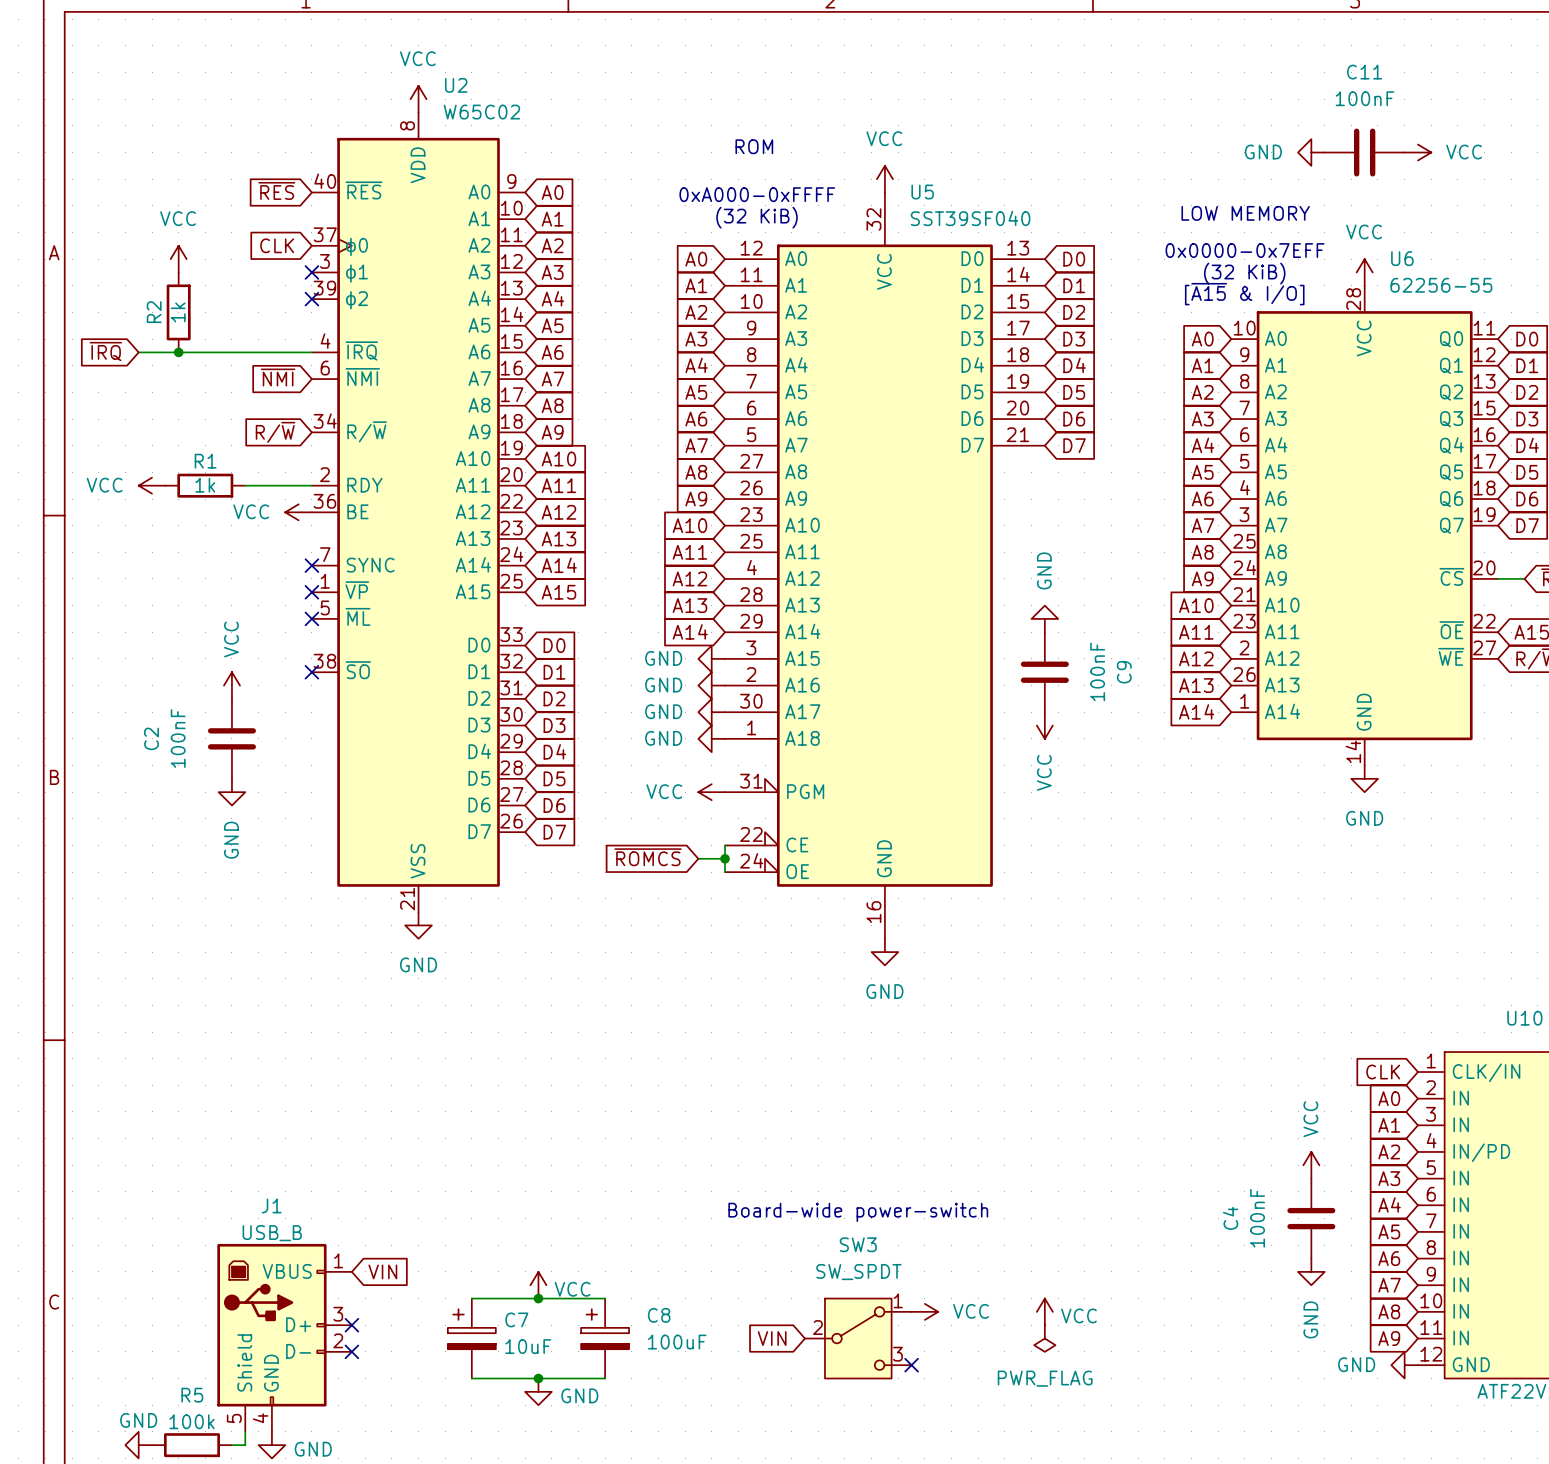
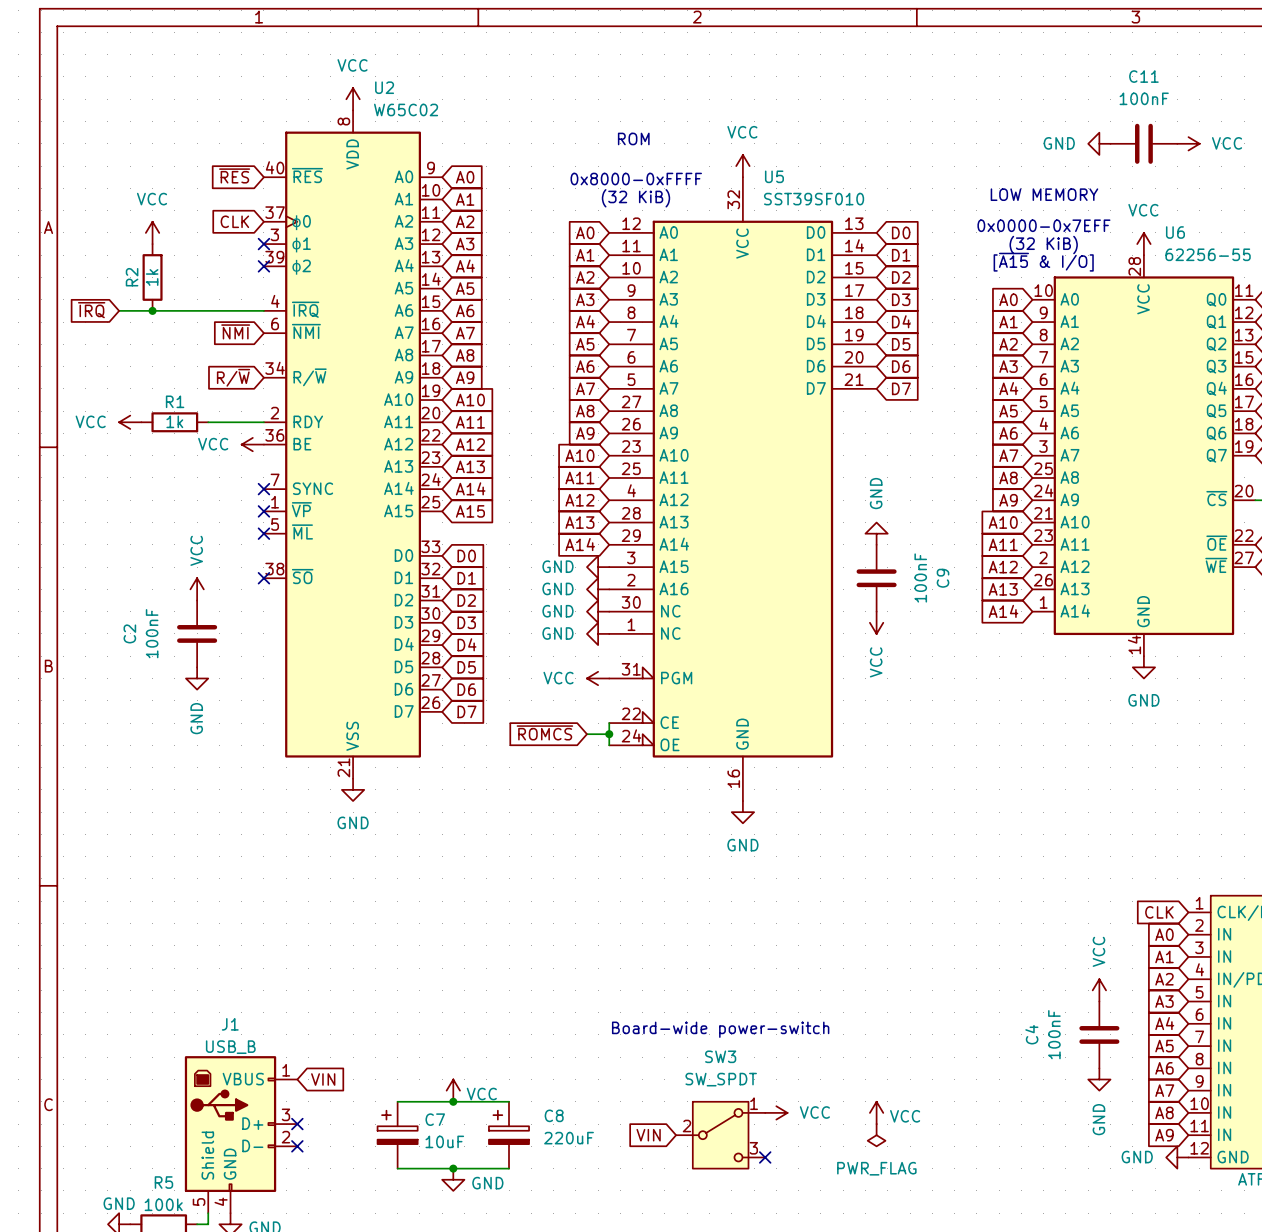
text: 0xA000-0xFFFF (757, 194) -> 0x8000-0xFFFF (636, 179)
U5 value: SST39SF040 (970, 218) -> SST39SF010 (814, 199)
U5 pin name: A17 (802, 711) -> NC (670, 611)
U5 pin name: A18 (802, 738) -> NC (670, 633)
C8 value: 100uF (677, 1342) -> 220uF (569, 1138)

